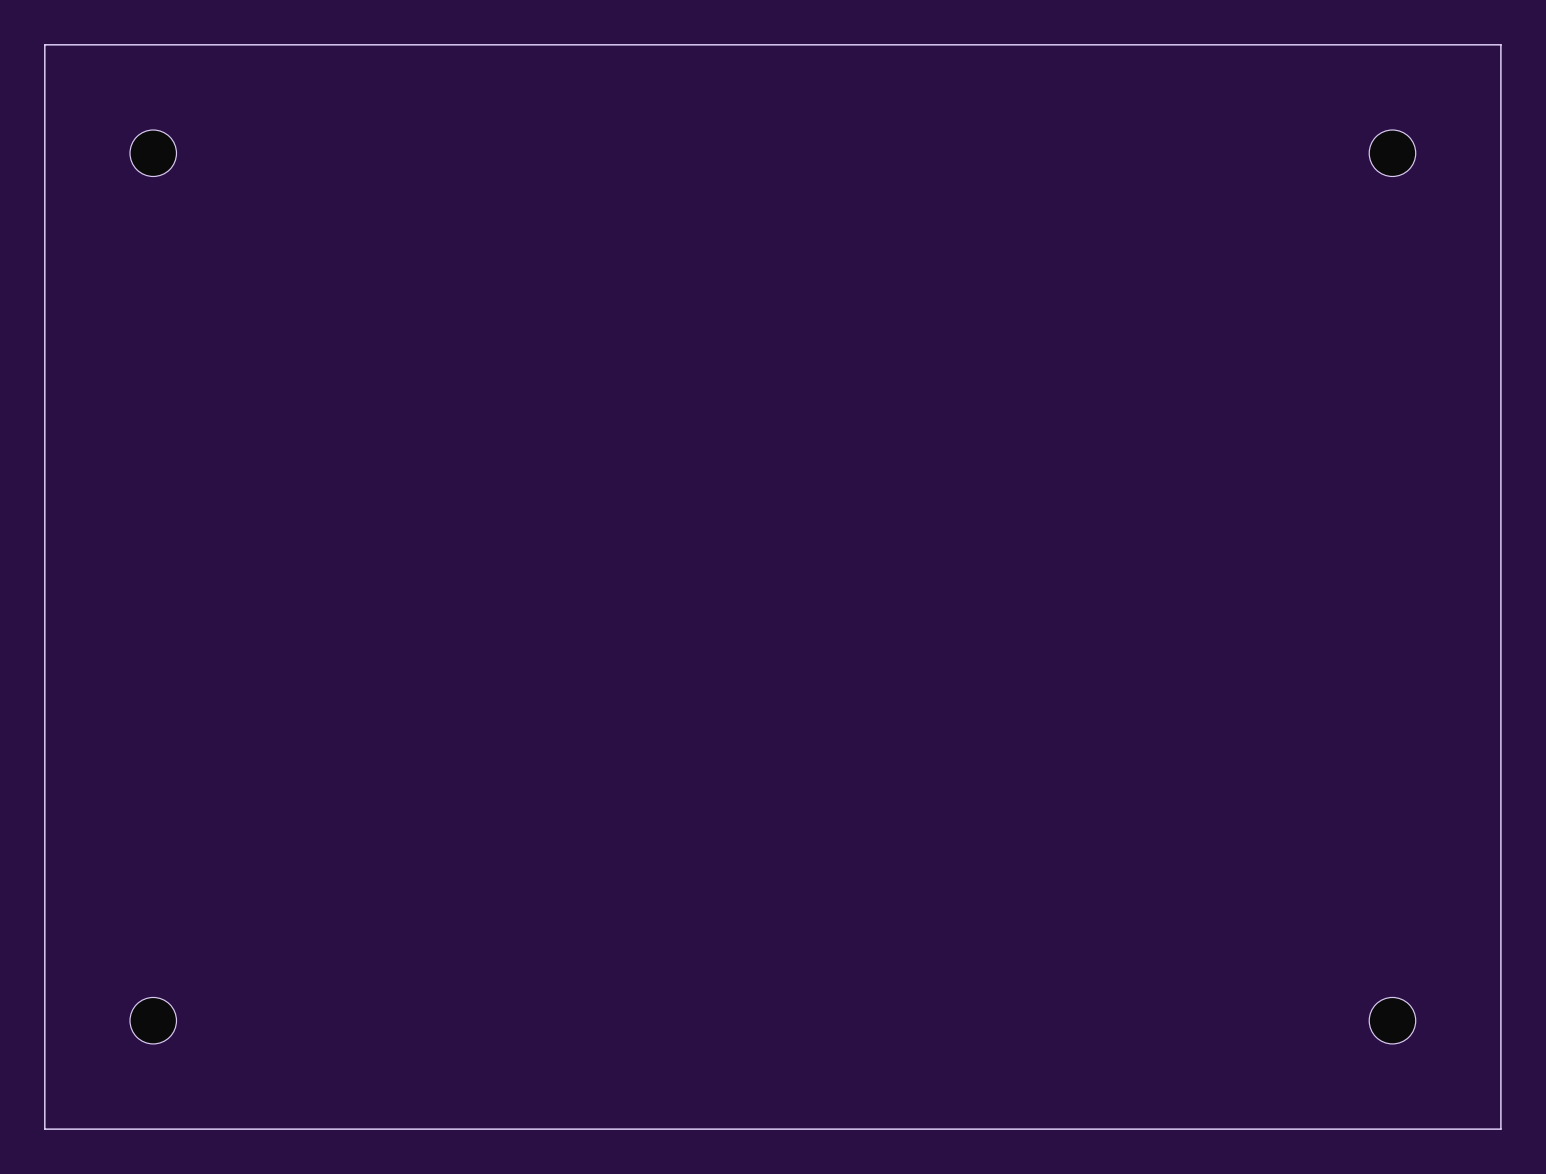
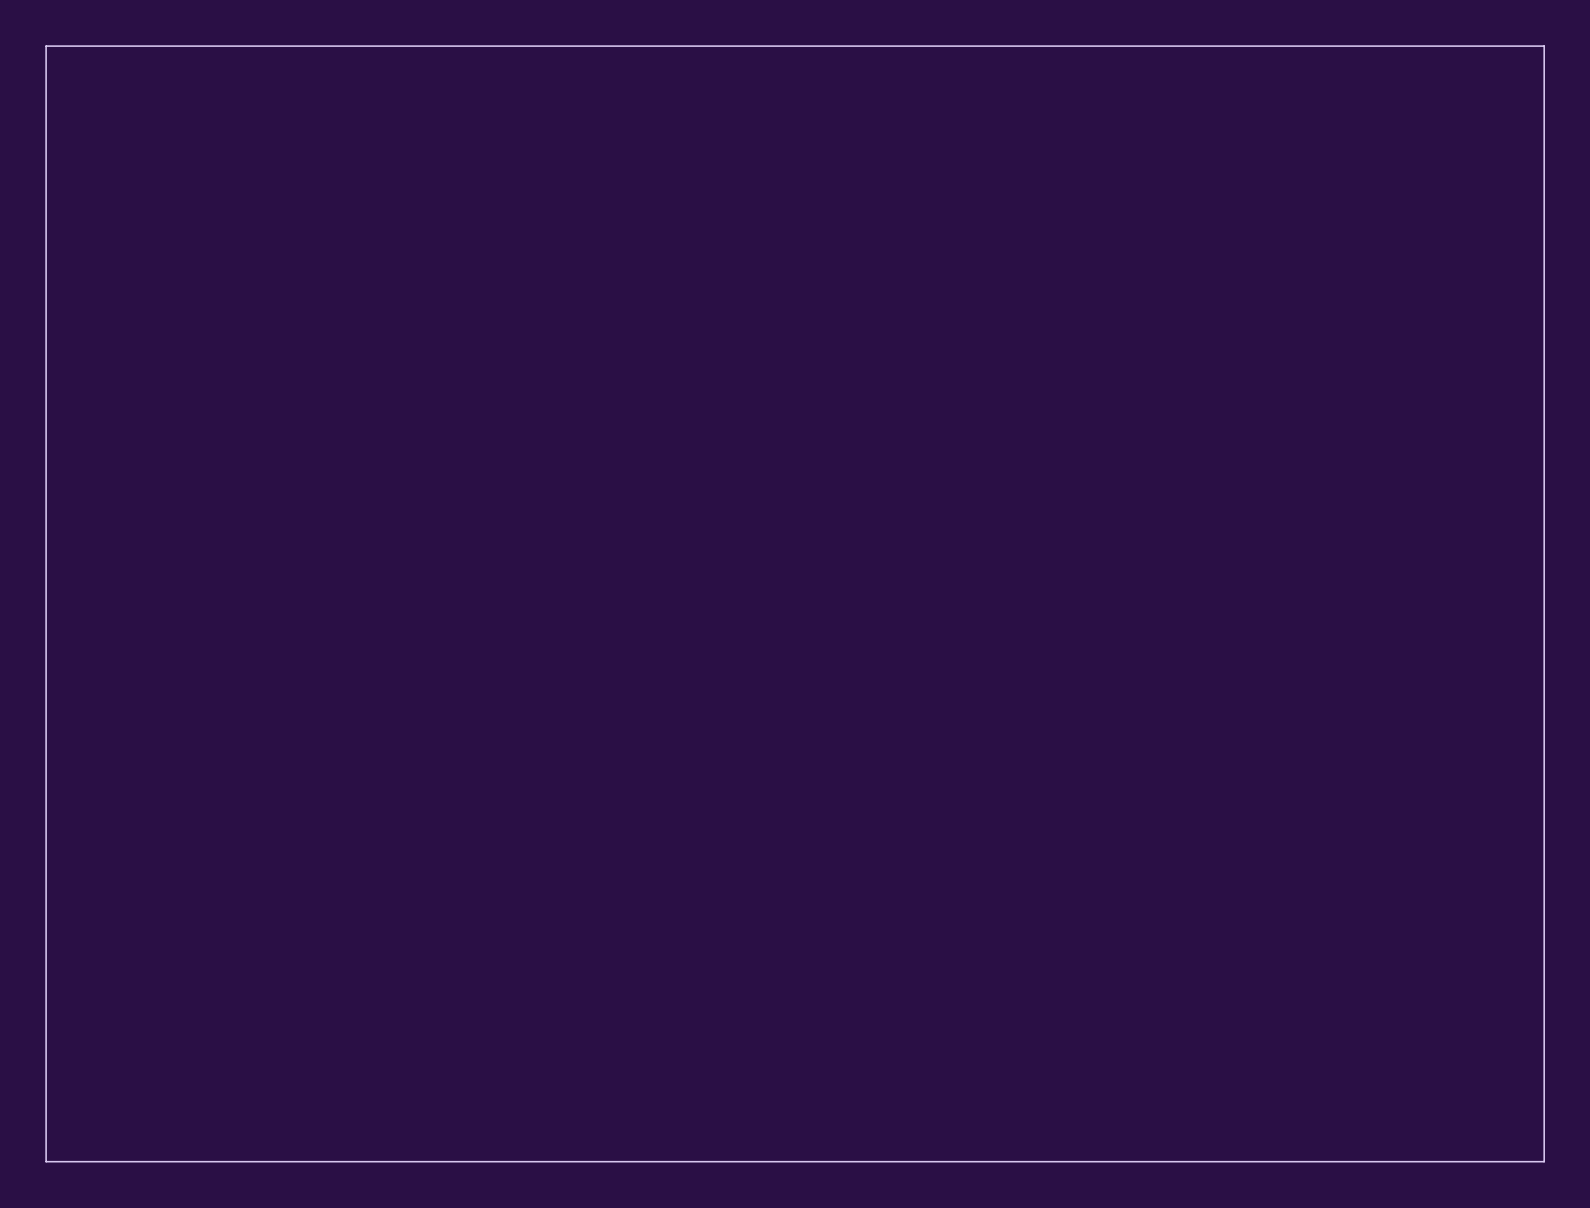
part: (153, 153) -> none
part: (1392, 153) -> none
part: (153, 1020) -> none
part: (1392, 1020) -> none

